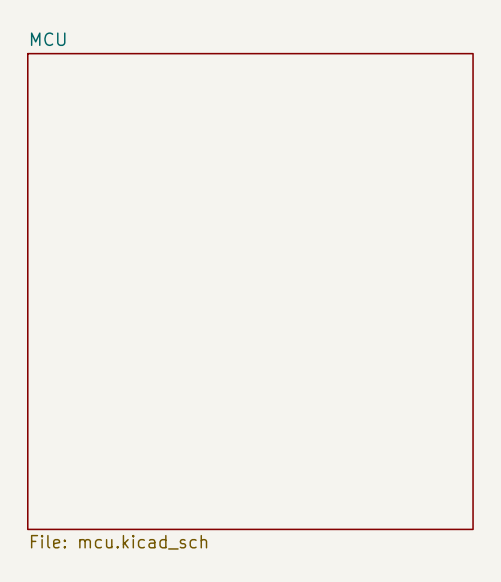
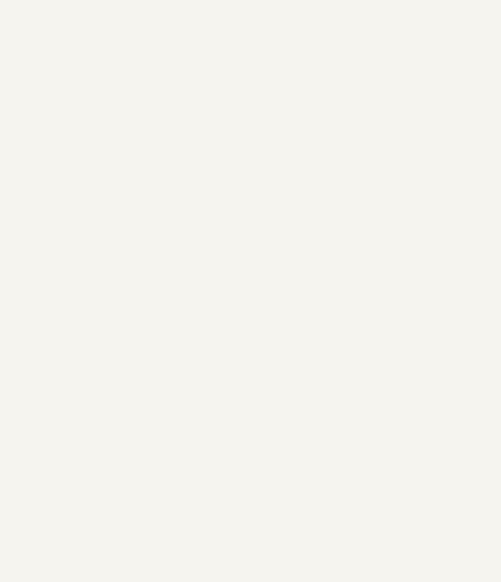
sheet MCU: File: mcu.kicad_sch (250, 291) -> none

